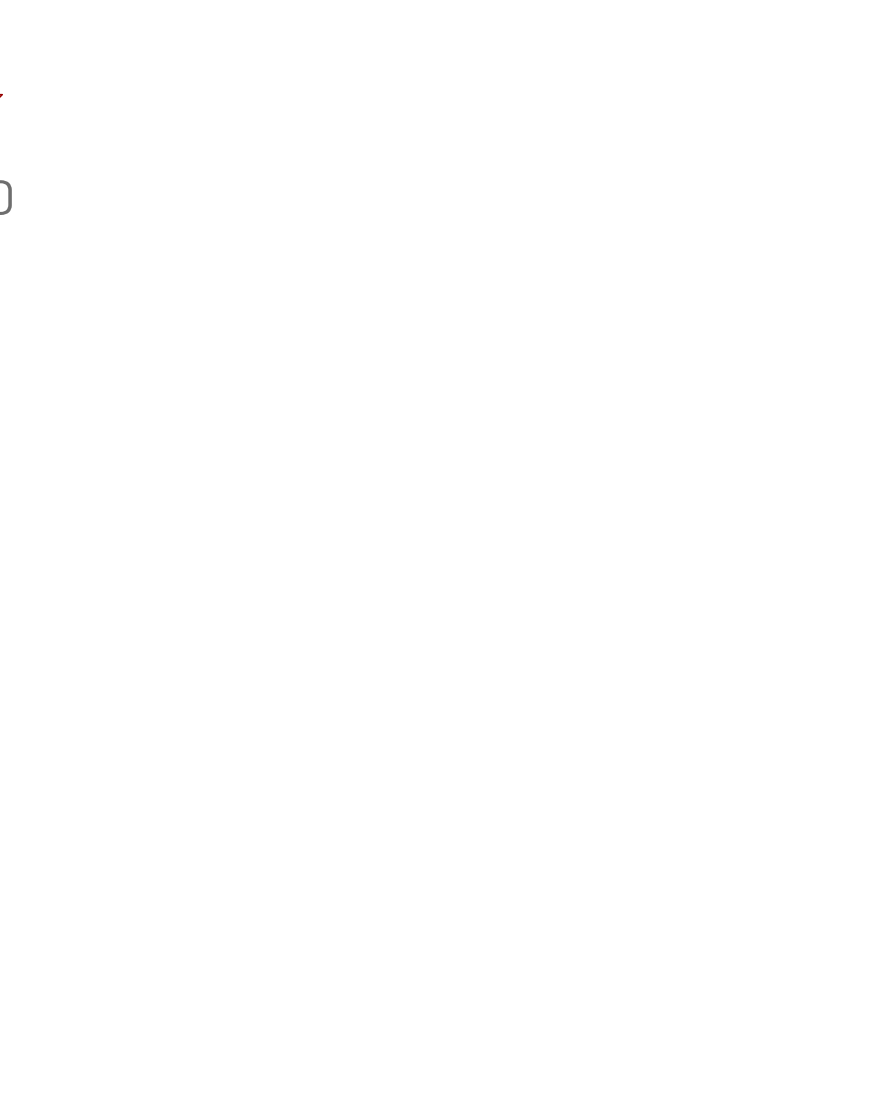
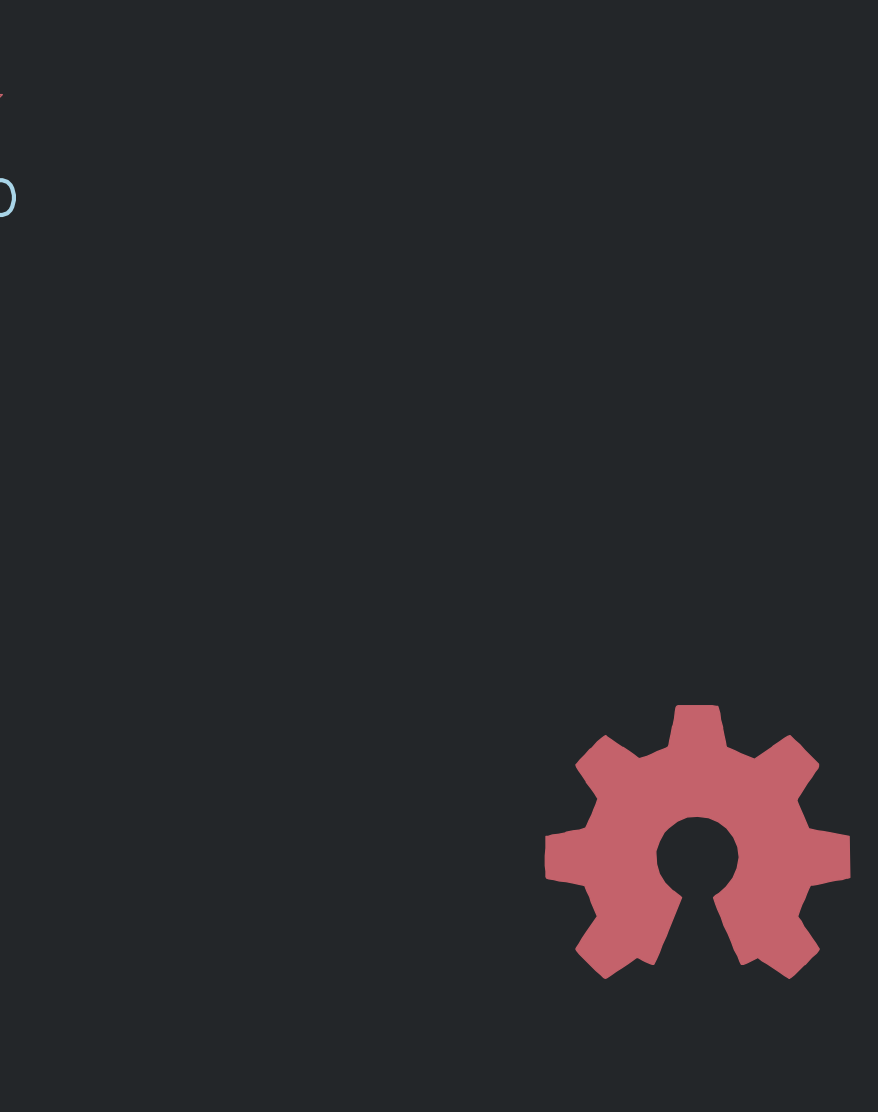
power symbol: none -> (697, 841)

